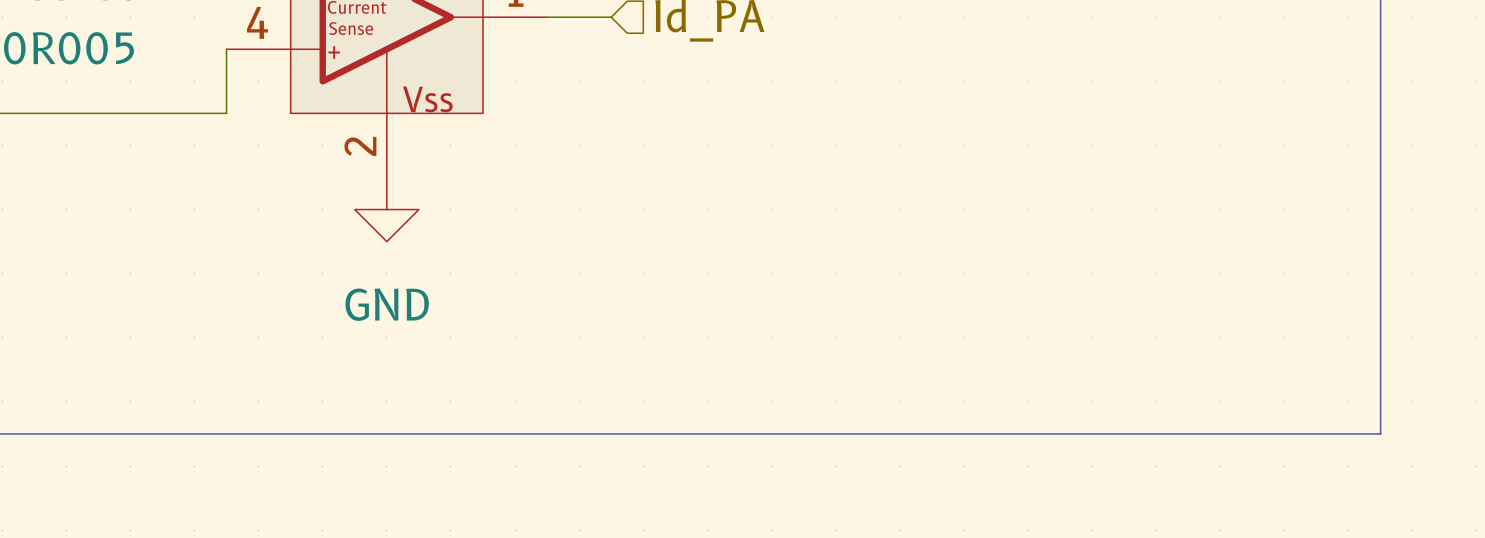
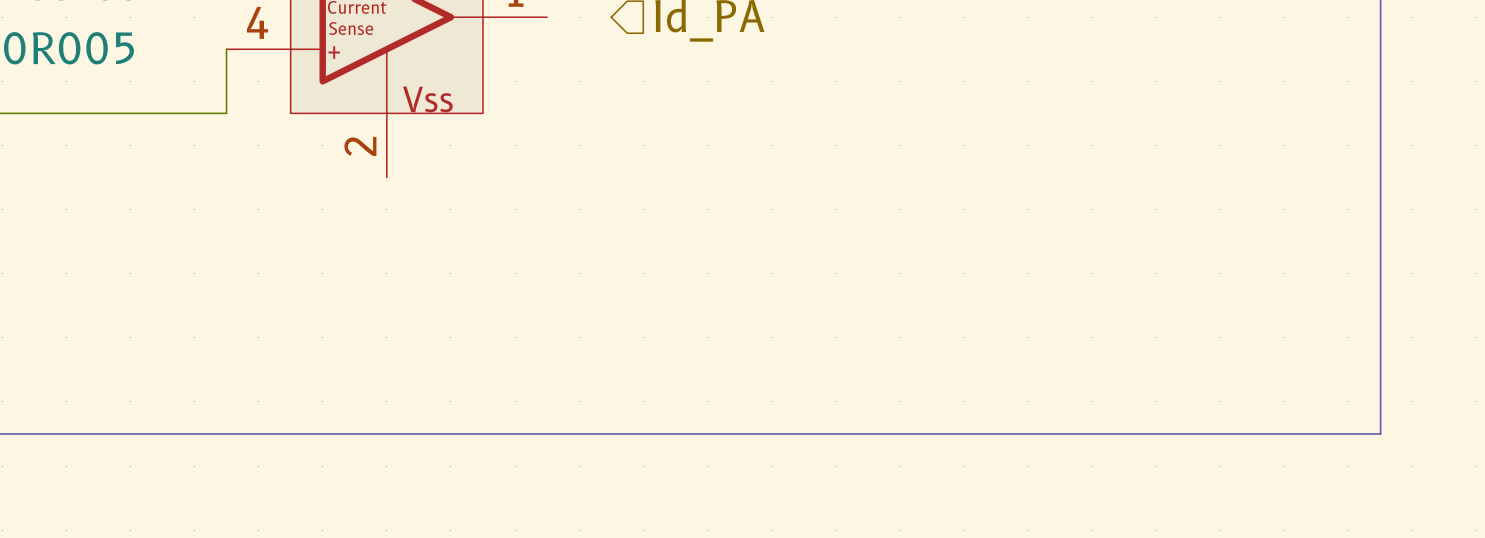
wire: (547, 17) (611, 17) -> none
power symbol: GND (386, 209) -> none

